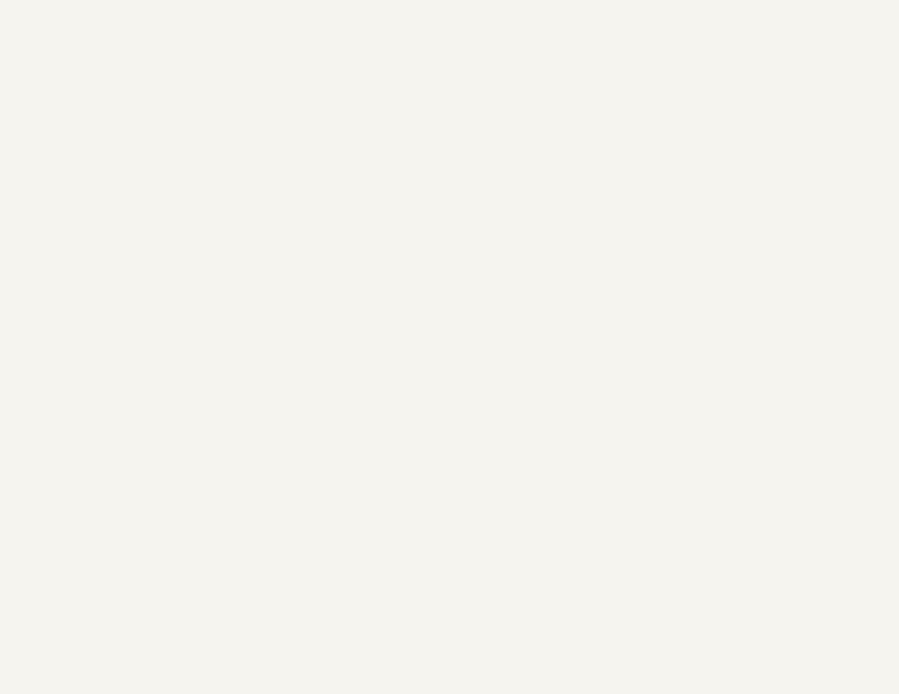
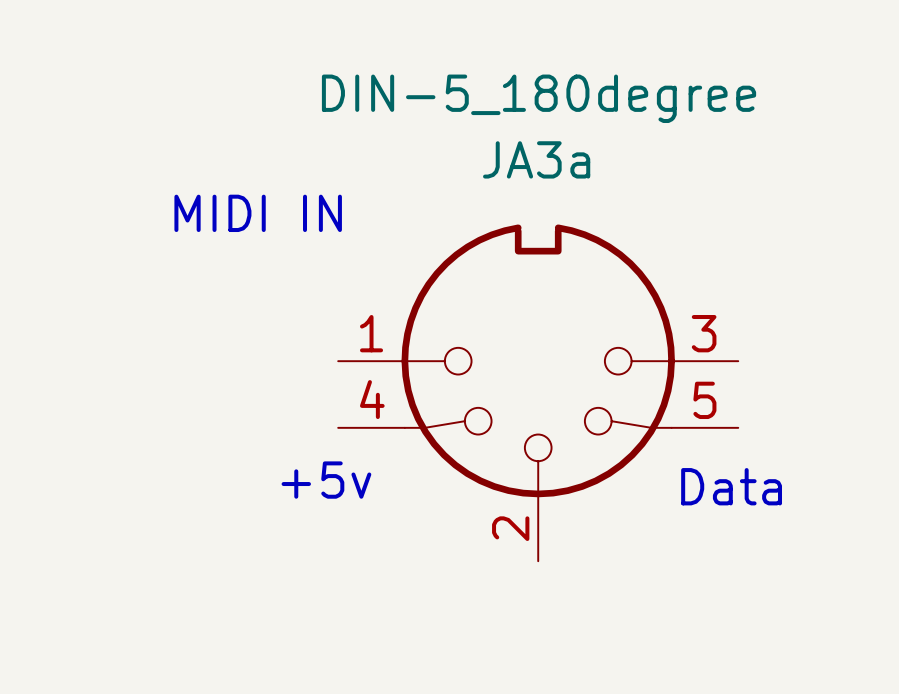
text: none -> MIDI IN (258, 213)
JA3a: none -> DIN-5_180degree (538, 392)
text: none -> +5v (326, 480)
text: none -> Data (731, 486)

